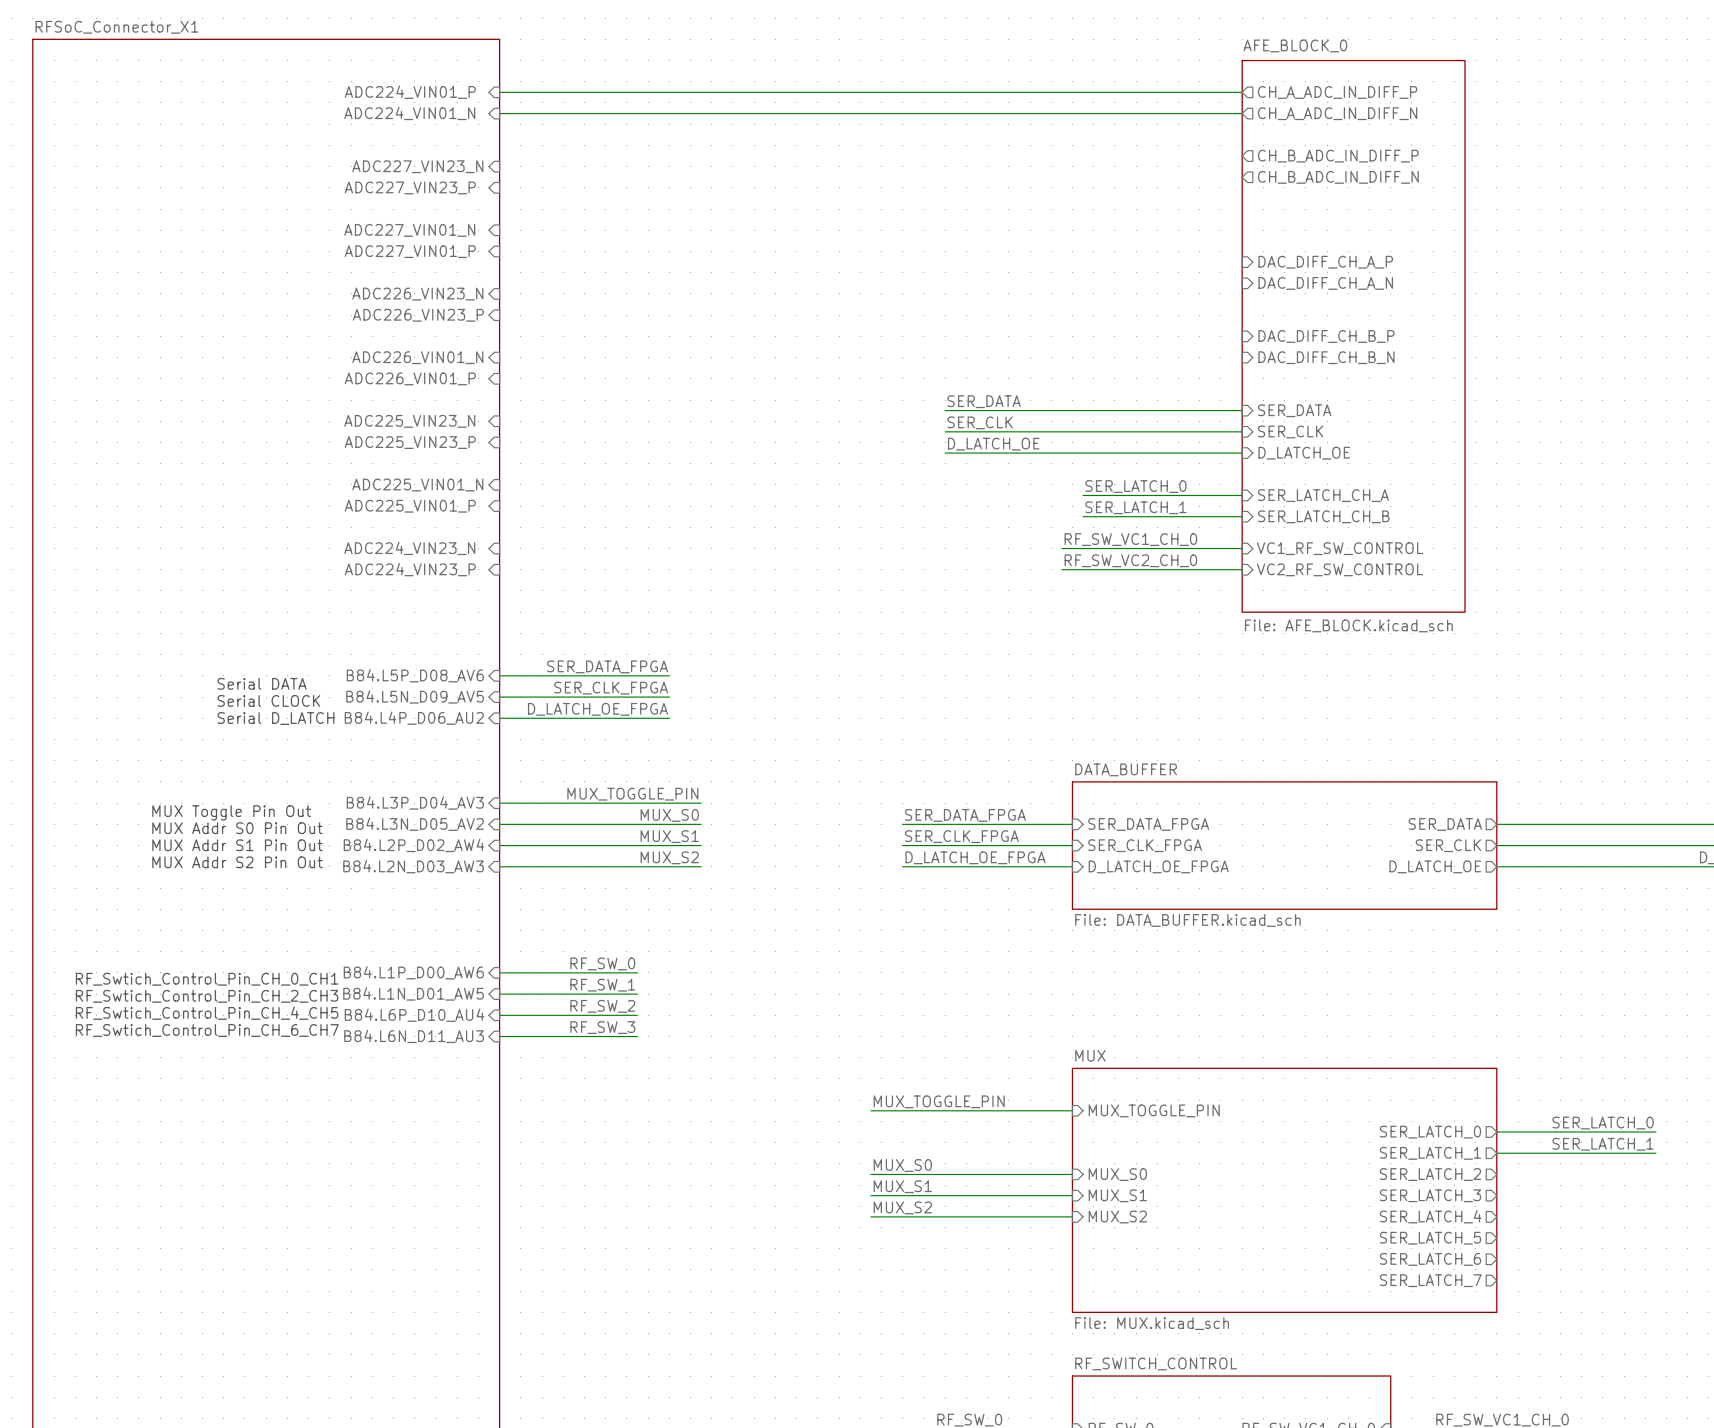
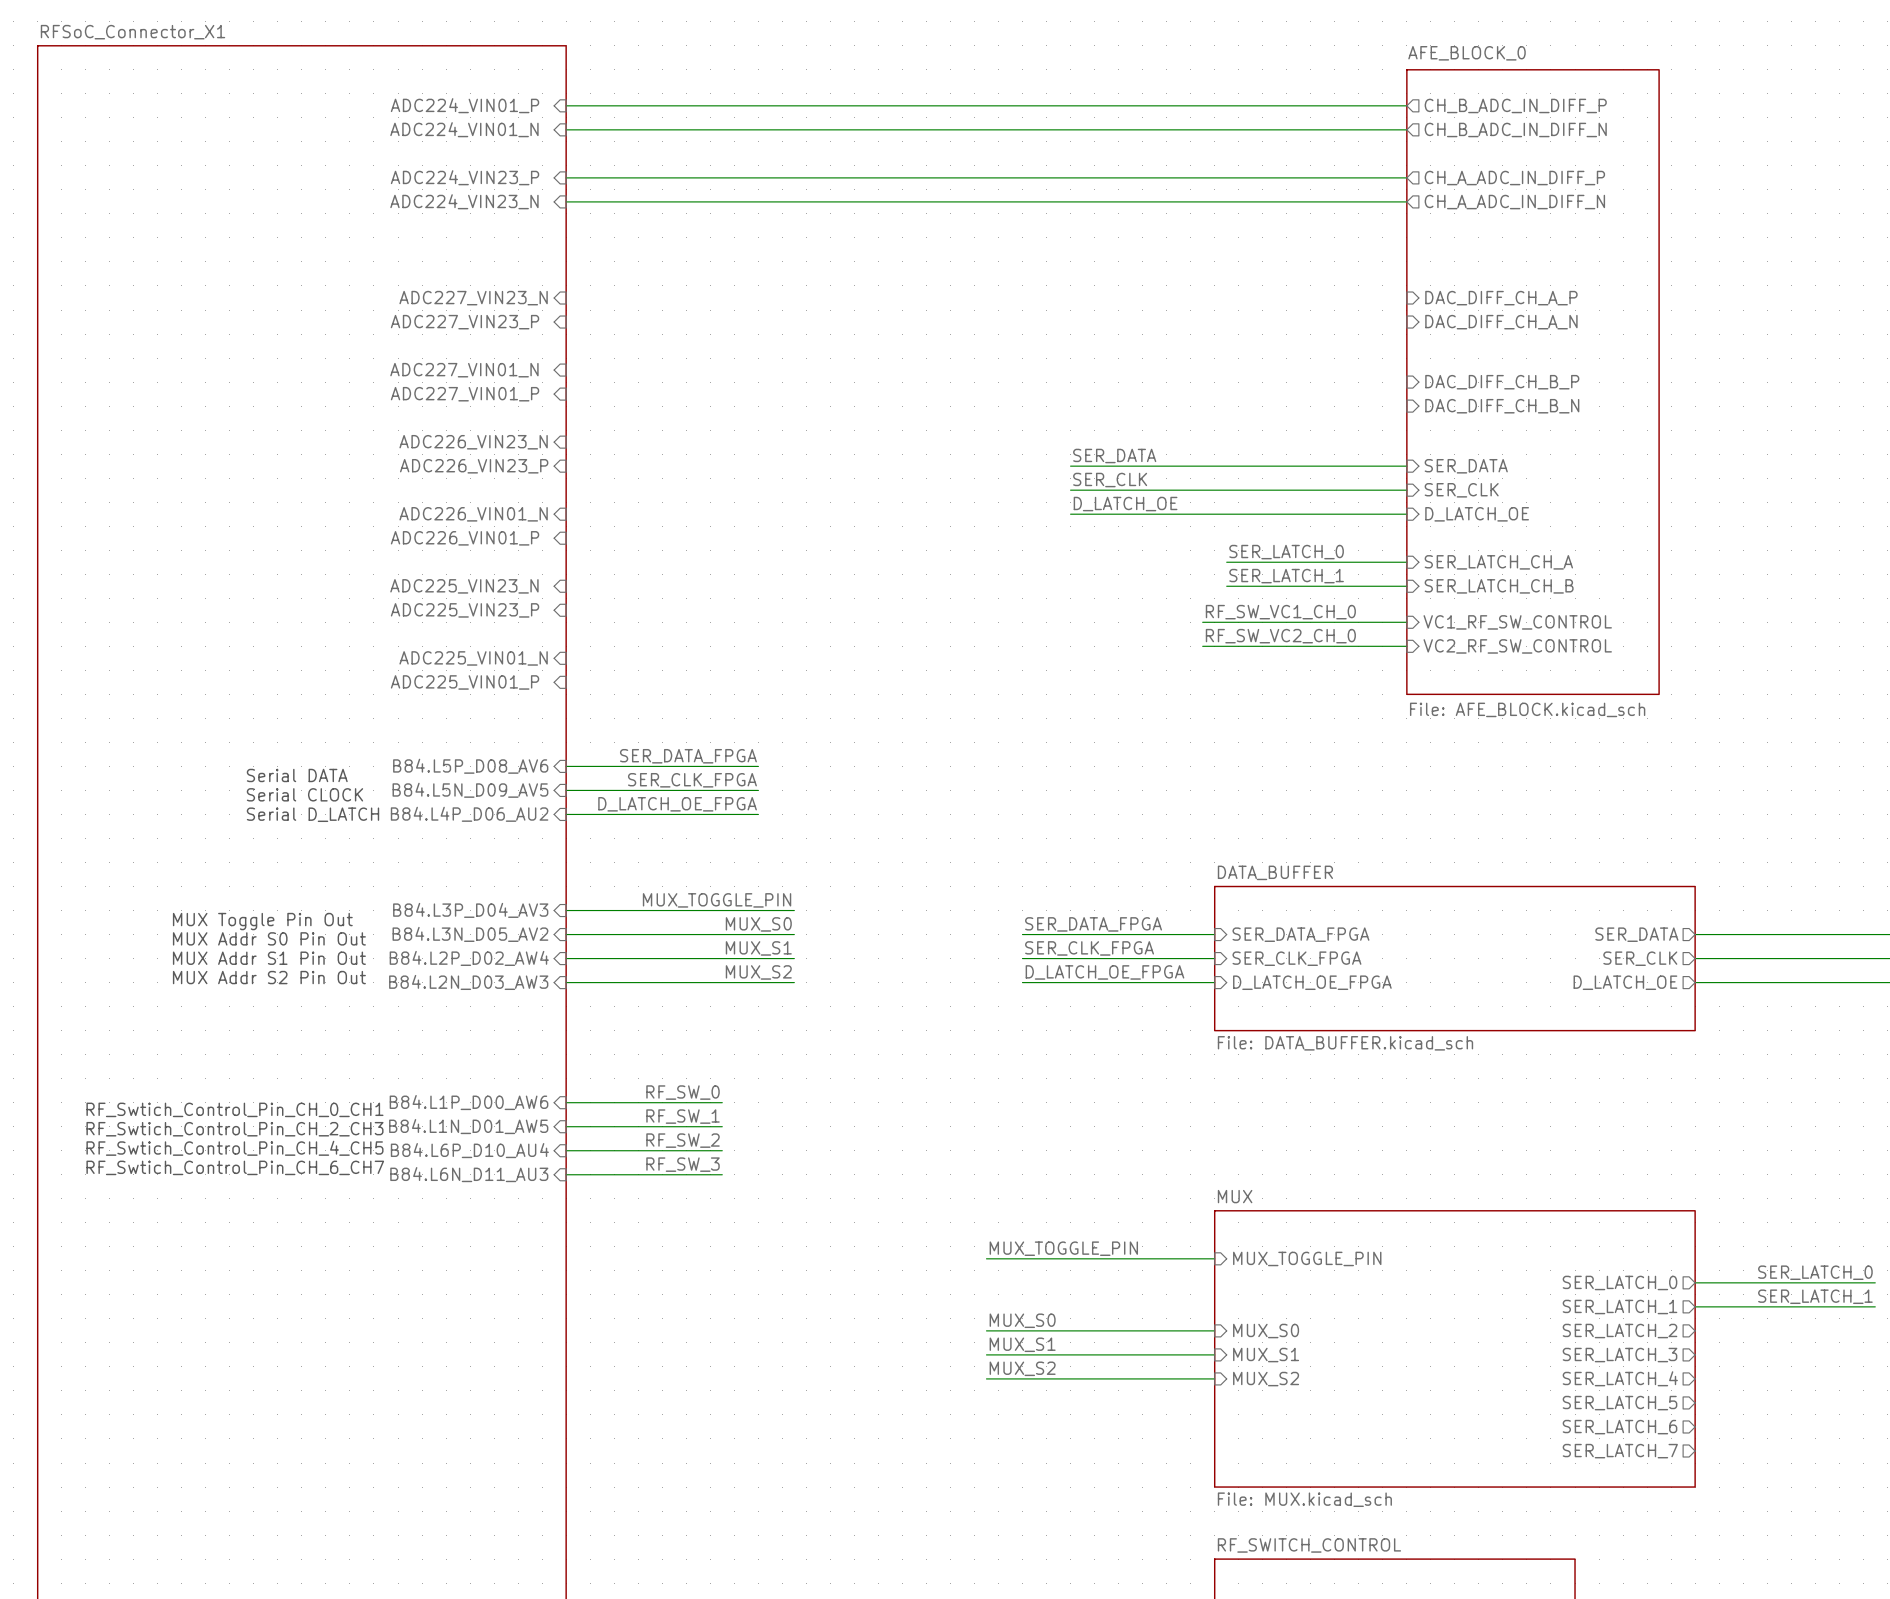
sheet pin: CH_A_ADC_IN_DIFF_P (1337, 92) -> CH_B_ADC_IN_DIFF_P (1515, 105)
sheet pin: CH_A_ADC_IN_DIFF_N (1337, 113) -> CH_B_ADC_IN_DIFF_N (1515, 129)
sheet pin: none -> ADC224_VIN23_P (465, 177)
wire: none -> (566, 177) (1406, 177)
sheet pin: CH_B_ADC_IN_DIFF_P (1338, 156) -> CH_A_ADC_IN_DIFF_P (1514, 178)
sheet pin position: ADC227_VIN23_N (417, 166) -> ADC227_VIN23_N (473, 298)
sheet pin: none -> ADC224_VIN23_N (464, 201)
wire: none -> (566, 201) (1406, 201)
sheet pin: CH_B_ADC_IN_DIFF_N (1338, 177) -> CH_A_ADC_IN_DIFF_N (1514, 202)
sheet pin position: ADC227_VIN23_P (410, 187) -> ADC227_VIN23_P (465, 322)
sheet pin position: ADC227_VIN01_N (409, 230) -> ADC227_VIN01_N (464, 370)
sheet pin position: ADC227_VIN01_P (410, 251) -> ADC227_VIN01_P (465, 394)
sheet pin position: ADC226_VIN23_N (417, 294) -> ADC226_VIN23_N (473, 442)
sheet pin position: ADC226_VIN23_P (418, 315) -> ADC226_VIN23_P (474, 466)
sheet pin position: ADC226_VIN01_N (417, 357) -> ADC226_VIN01_N (473, 514)
sheet pin position: ADC226_VIN01_P (410, 378) -> ADC226_VIN01_P (465, 538)
sheet pin position: ADC225_VIN23_N (409, 421) -> ADC225_VIN23_N (464, 586)
sheet pin position: ADC225_VIN23_P (410, 442) -> ADC225_VIN23_P (465, 610)
sheet pin position: ADC225_VIN01_N (417, 484) -> ADC225_VIN01_N (473, 658)
sheet pin position: ADC225_VIN01_P (410, 506) -> ADC225_VIN01_P (465, 682)
sheet pin: ADC224_VIN23_N (409, 548) -> none
sheet pin: ADC224_VIN23_P (410, 569) -> none

